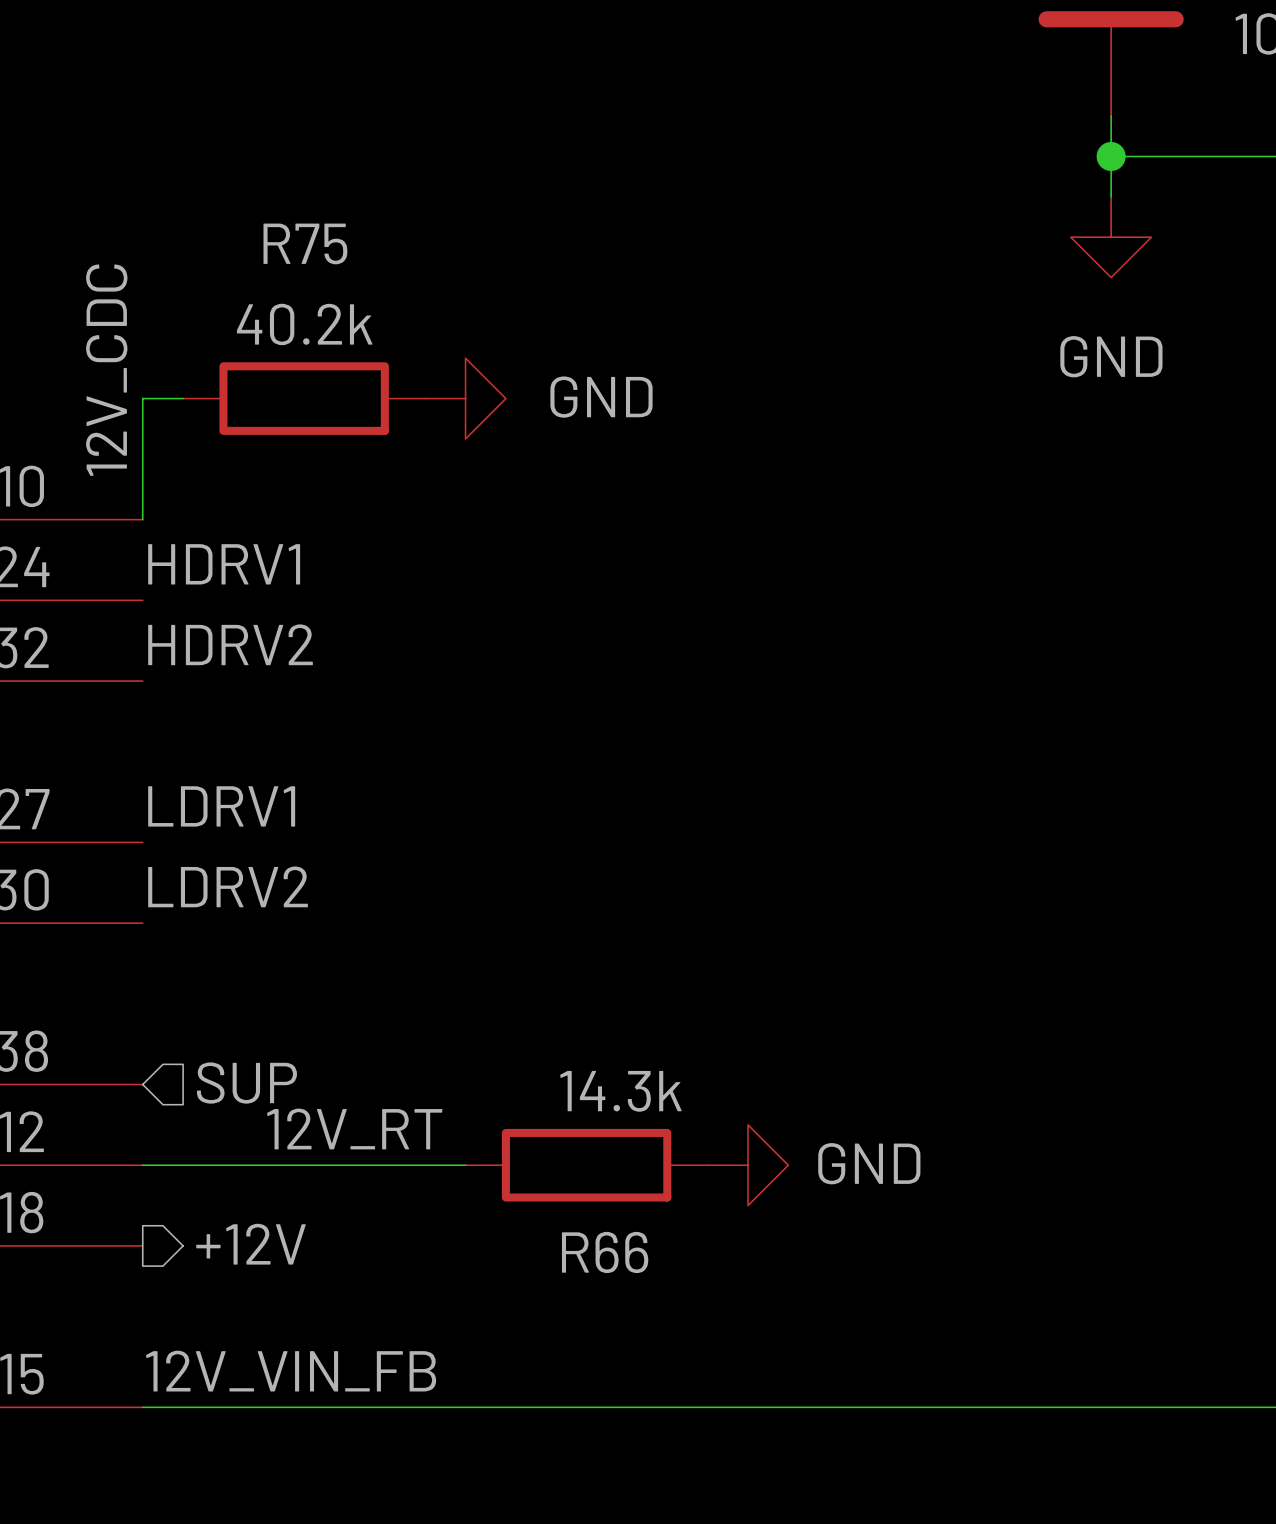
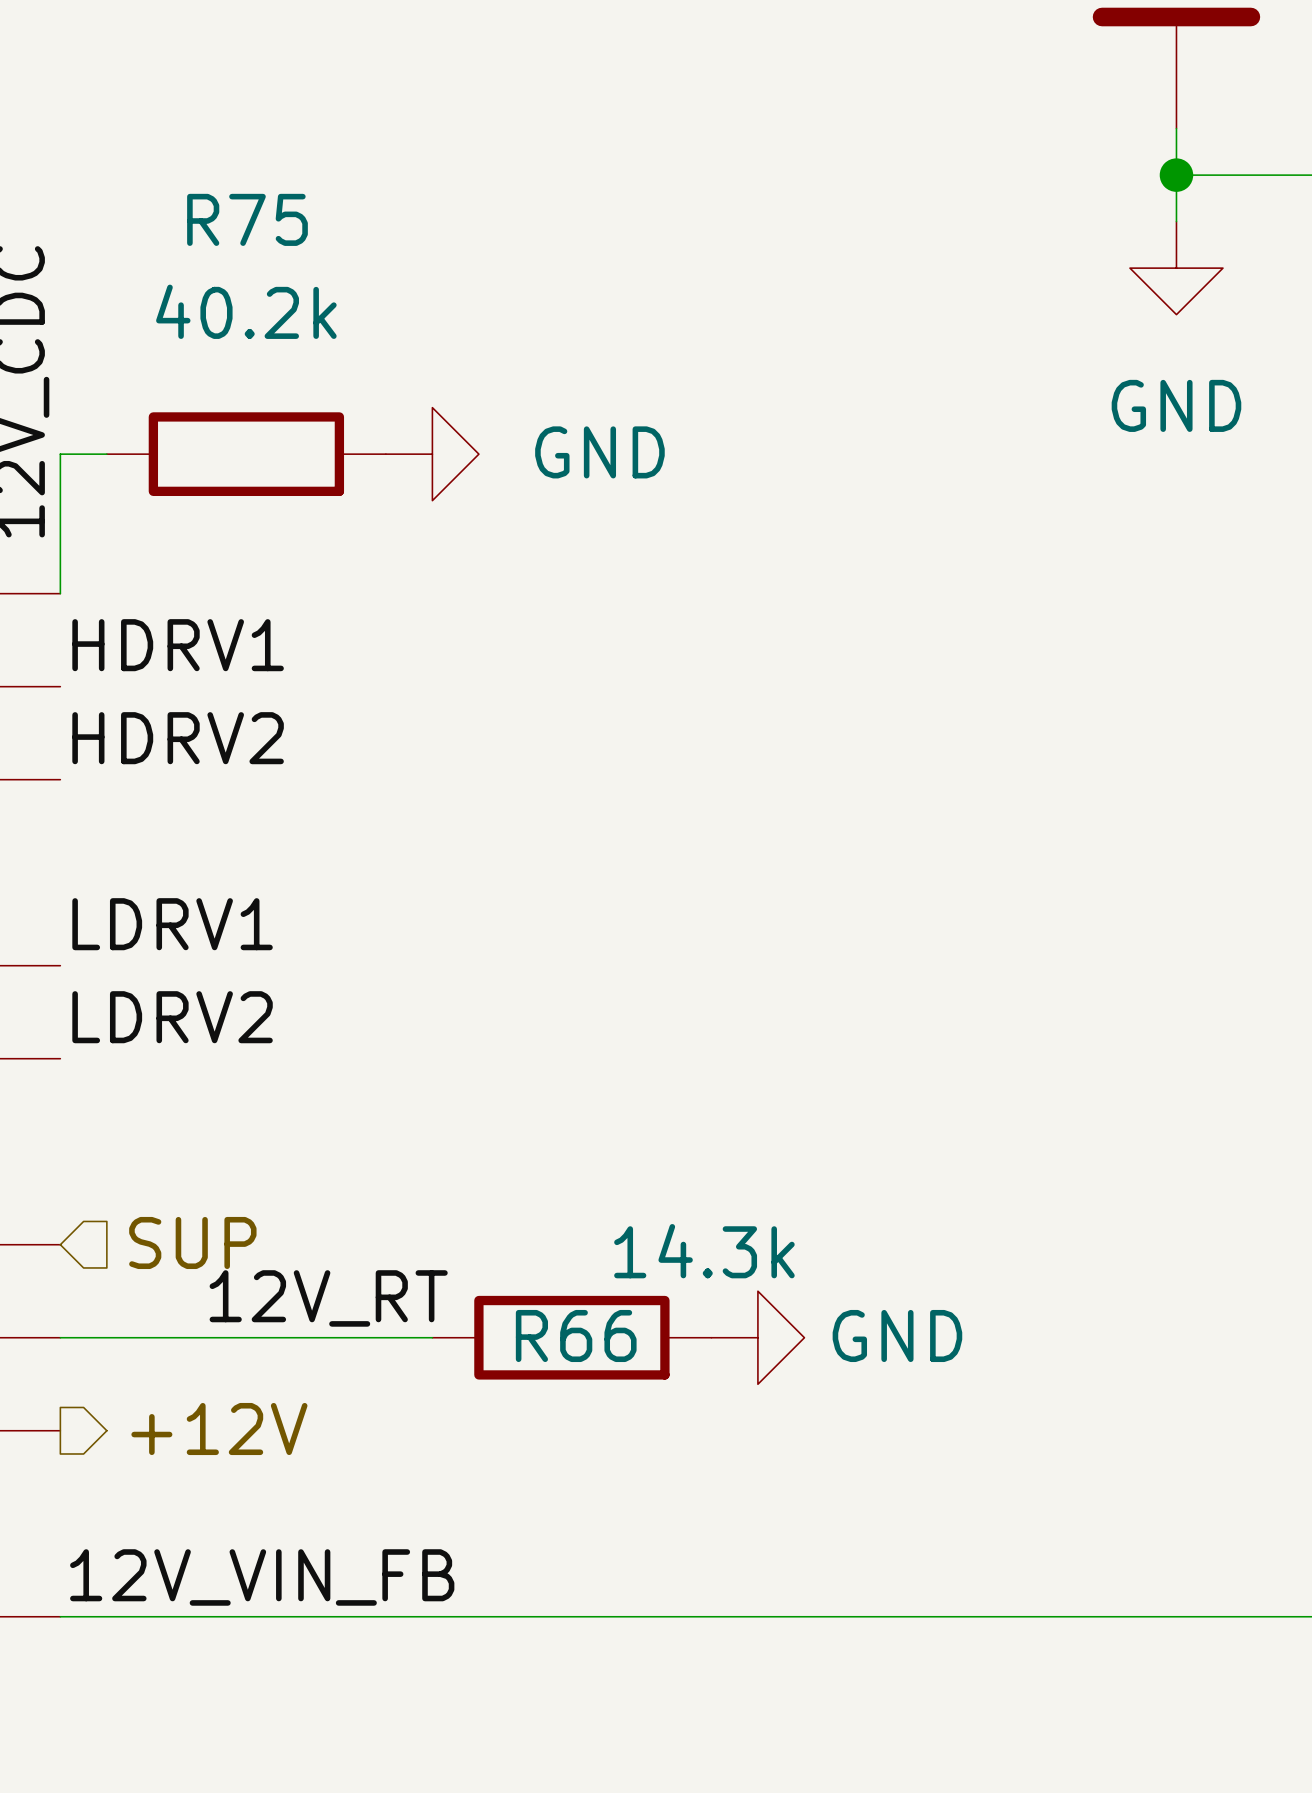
R75 name position: R75 (305, 243) -> R75 (247, 219)
R75 value position: 40.2k (304, 324) -> 40.2k (246, 311)
R66 value position: 14.3k (620, 1091) -> 14.3k (704, 1251)
R66 name position: R66 (605, 1252) -> R66 (576, 1335)

